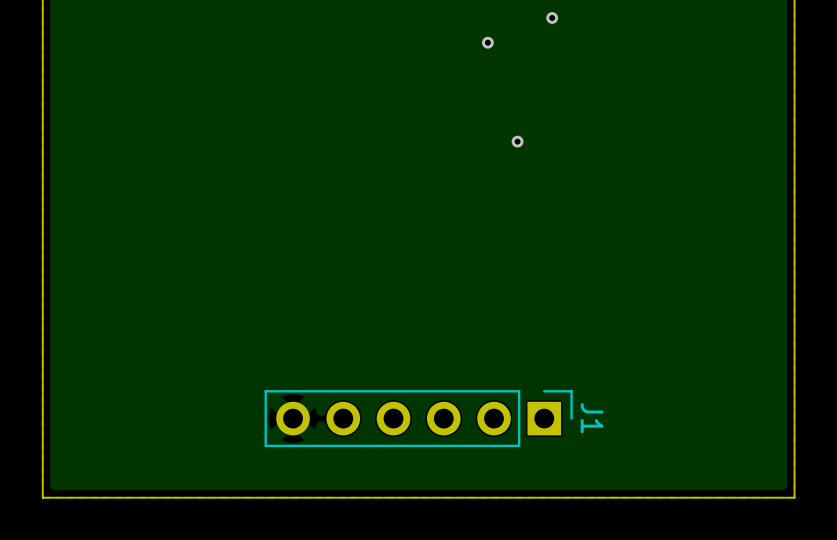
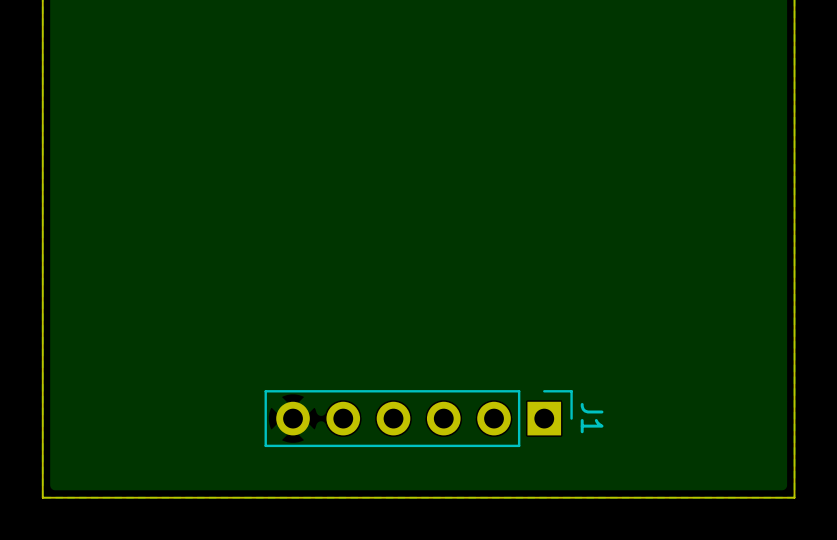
via: (552, 17) -> none
via: (487, 42) -> none
via: (517, 141) -> none

